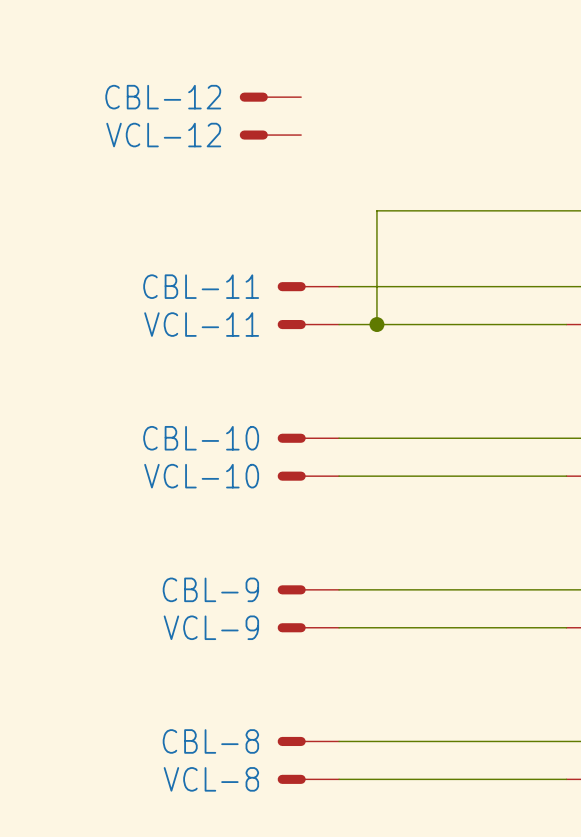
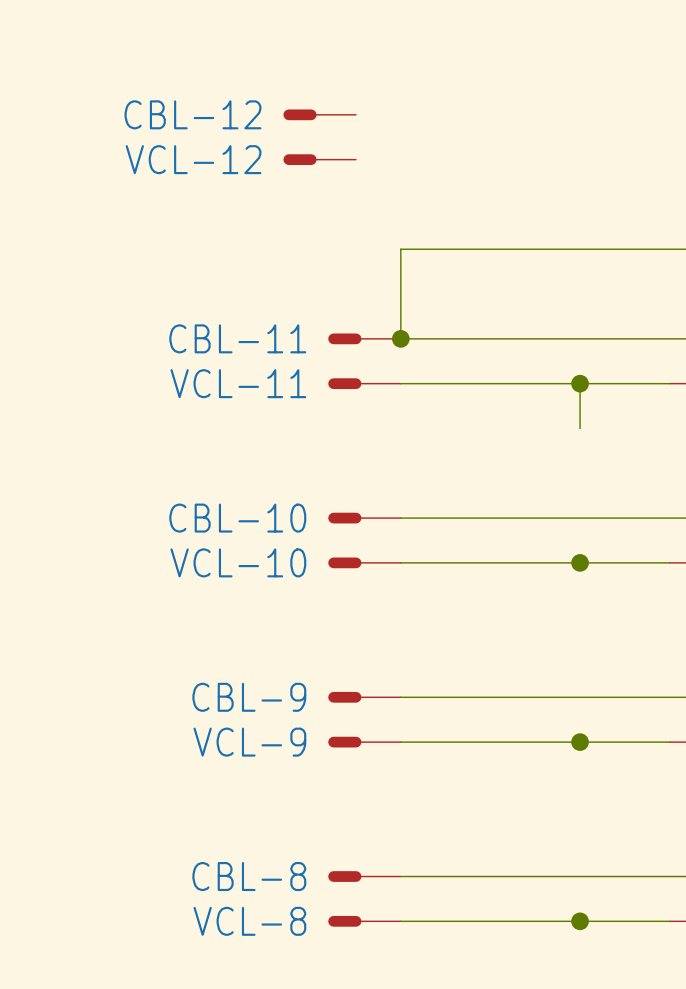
wire: (376, 210) (376, 324) -> (445, 249) (400, 249) (400, 338)
junction position: (376, 324) -> (400, 338)
wire: none -> (580, 383) (580, 428)
junction: none -> (580, 383)
junction: none -> (580, 562)
junction: none -> (580, 742)
junction: none -> (580, 921)

